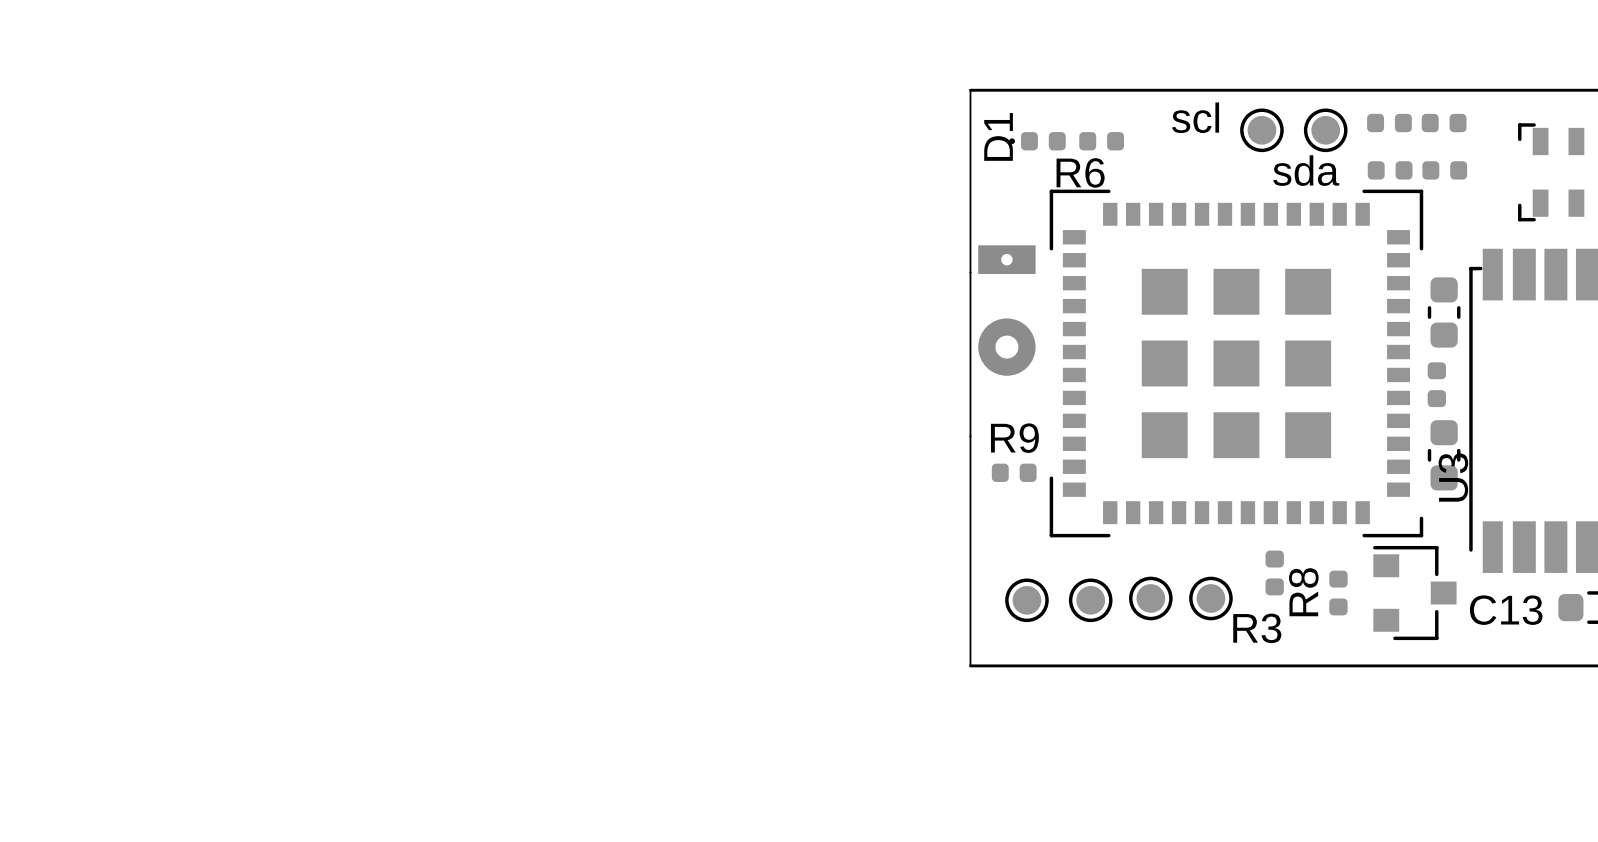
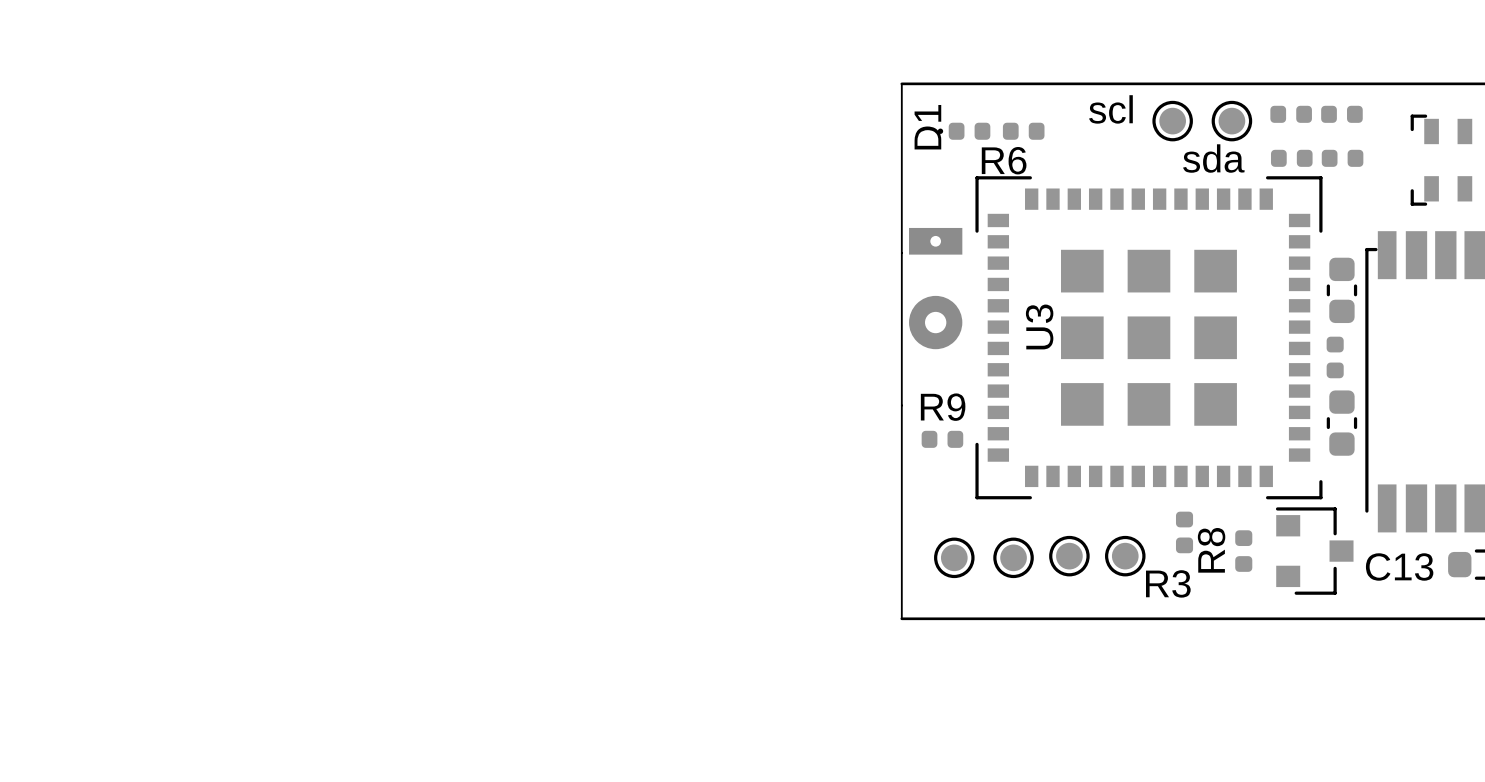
U3 name position: U3 (1453, 477) -> U3 (1039, 326)

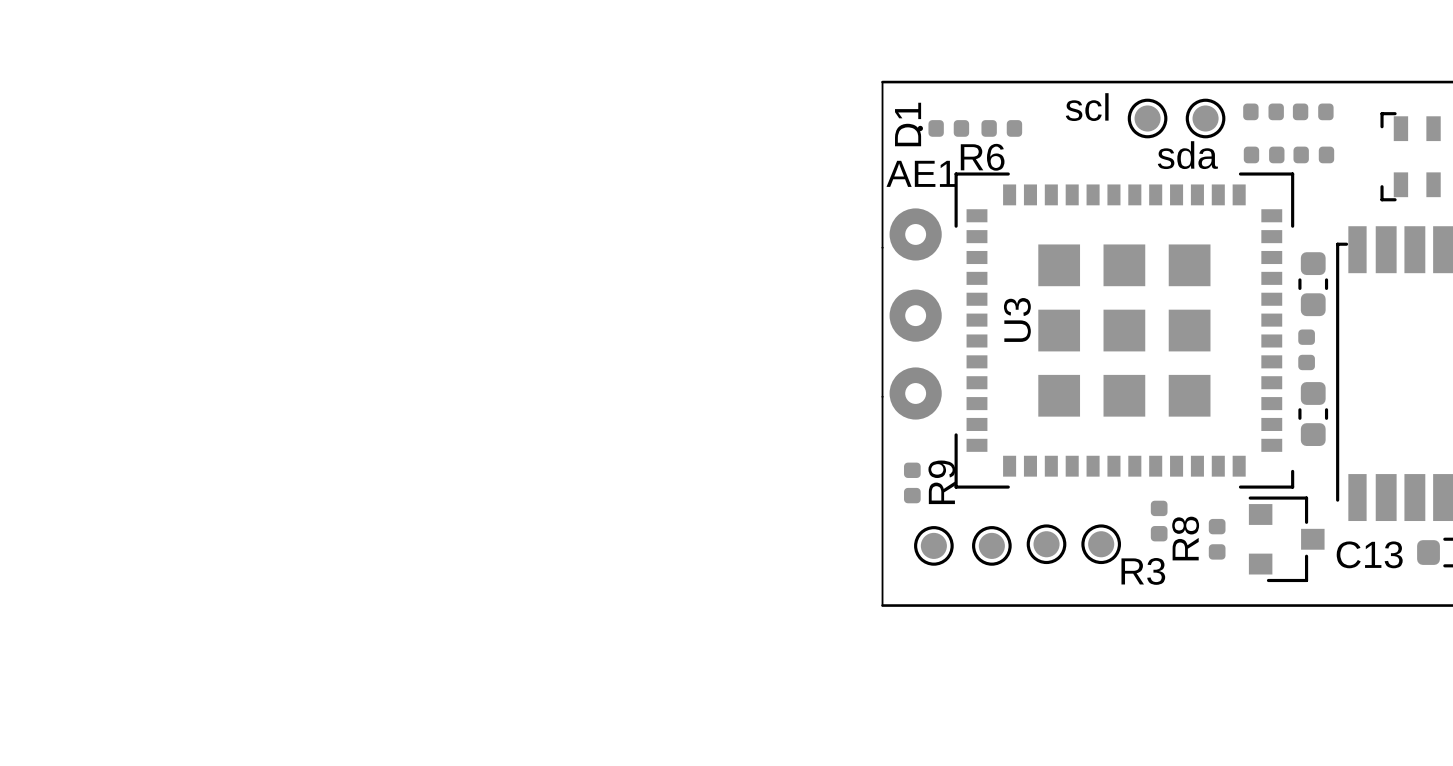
AE1: none -> (915, 234)
part: (935, 241) -> none
part: none -> (915, 393)
R9 rotation: 0° (942, 439) -> 90° clockwise (912, 482)
R9 position: (942, 439) -> (912, 482)

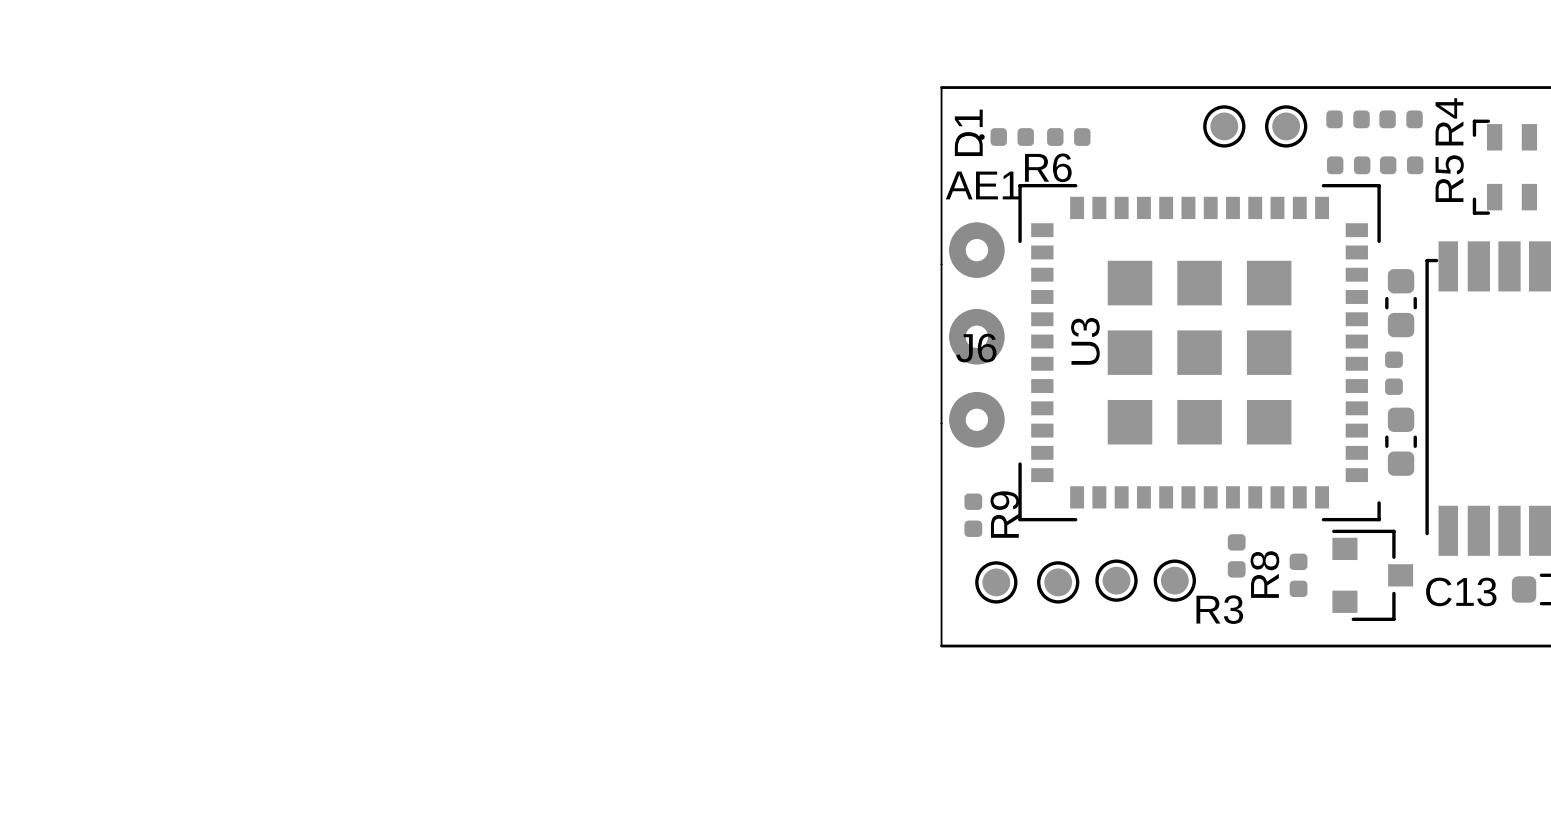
text: scl (1087, 107) -> none
R4 name: none -> R4 (1449, 121)
text: sda (1187, 155) -> none
R5 name: none -> R5 (1449, 178)
J6 name: none -> J6 (976, 348)

